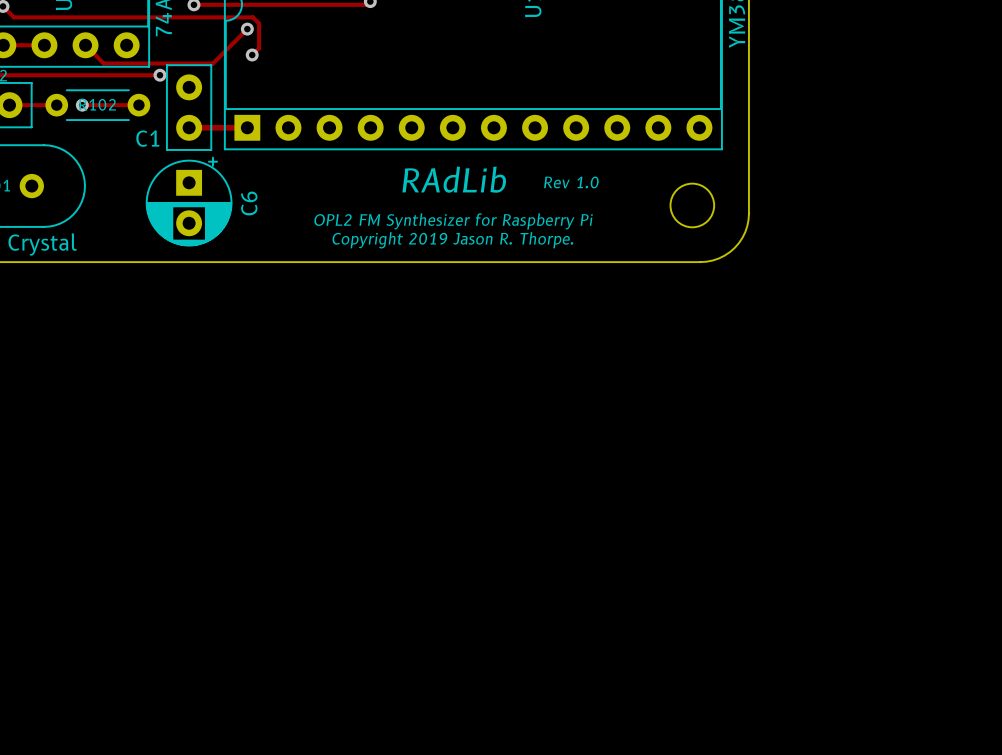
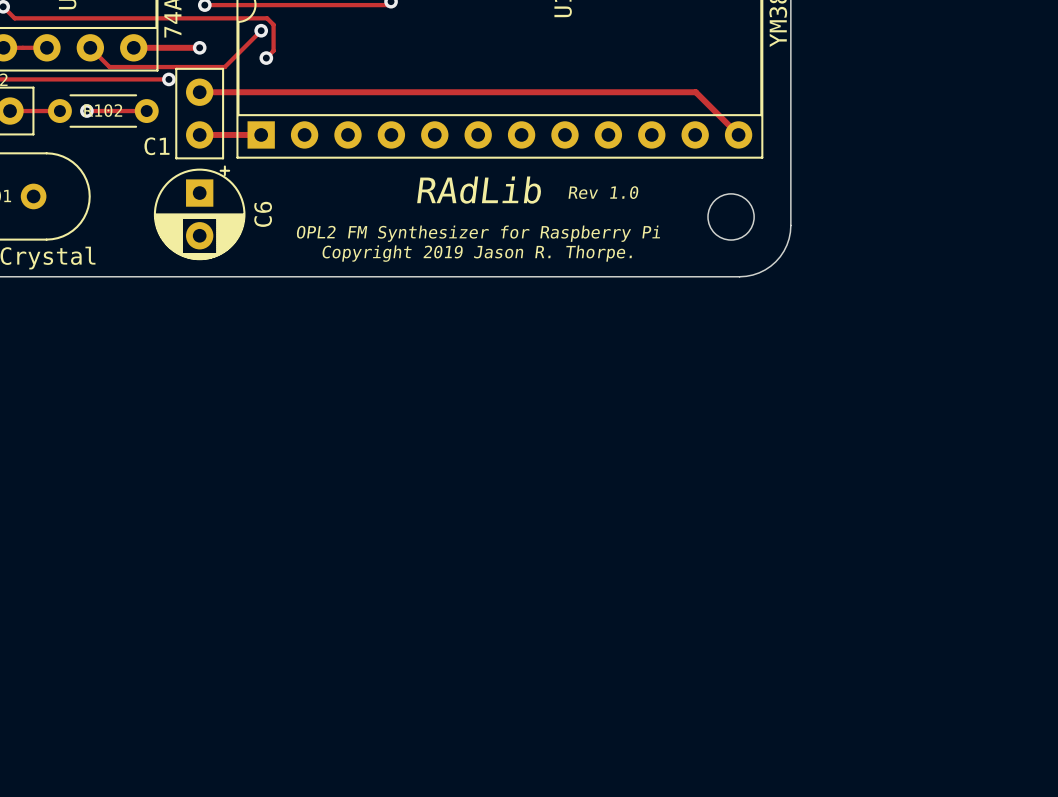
track: none -> (133, 47) (199, 47)
via: none -> (199, 47)
track: none -> (199, 92) (695, 92) (738, 134)

